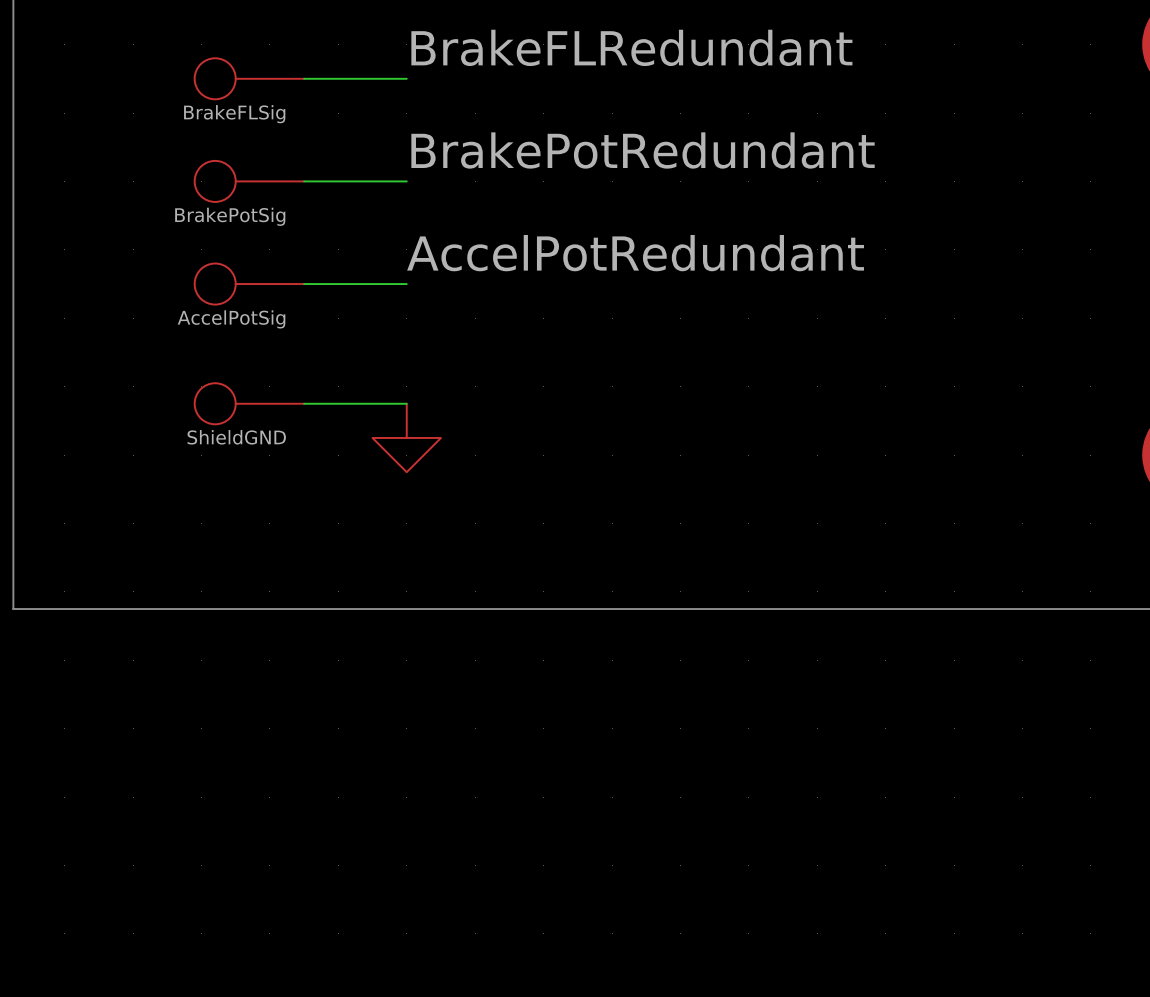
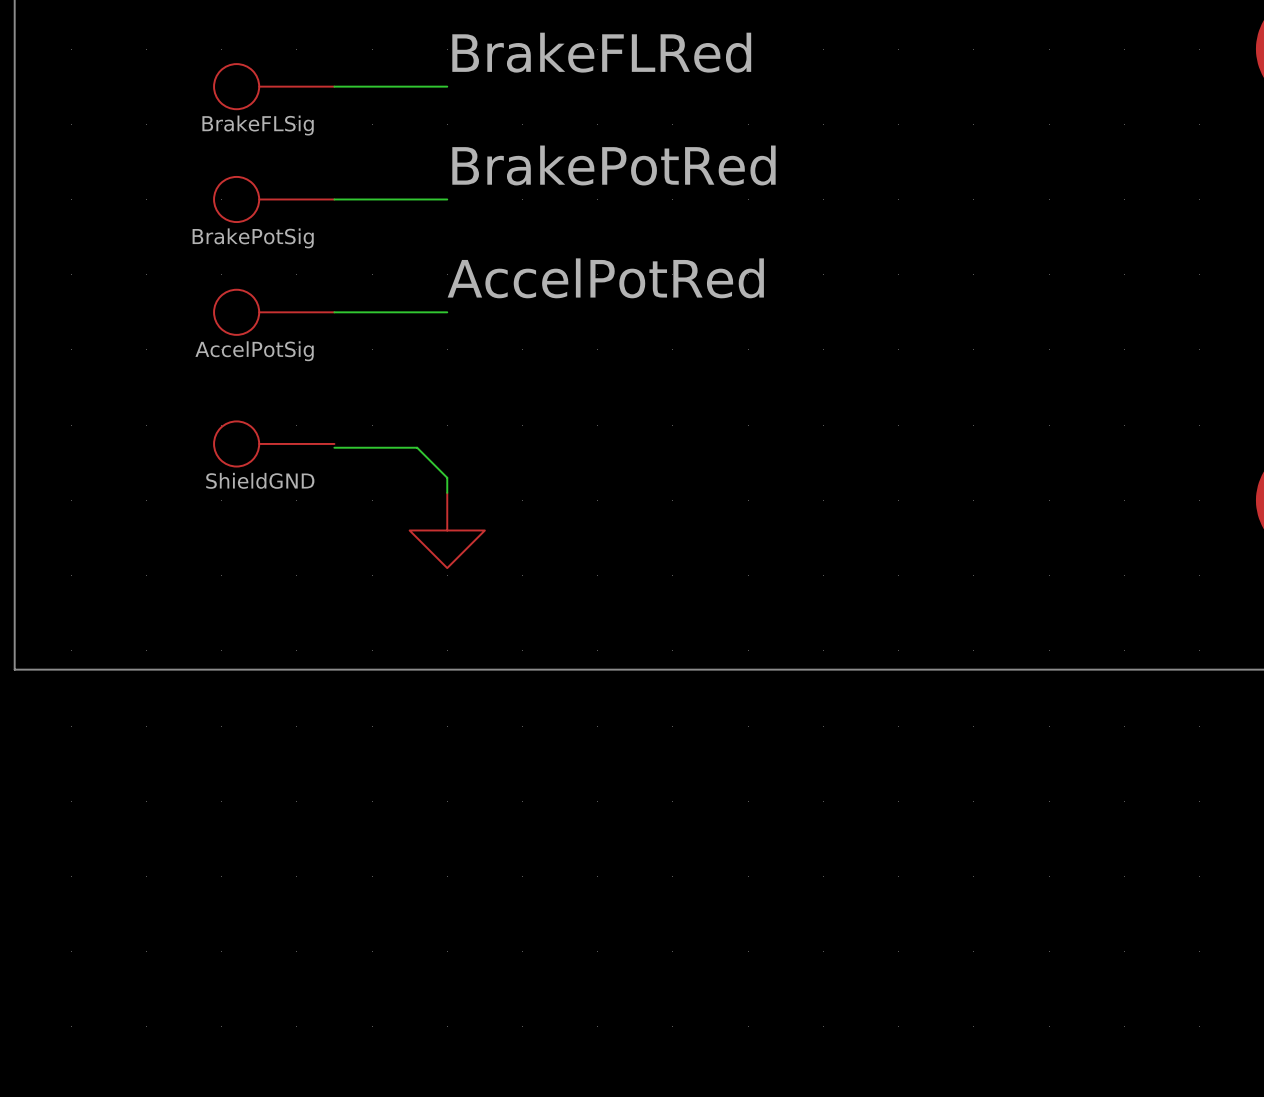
label: BrakeFLRedundant (631, 47) -> BrakeFLRed (601, 52)
label: BrakePotRedundant (643, 150) -> BrakePotRed (613, 165)
label: AccelPotRedundant (635, 253) -> AccelPotRed (605, 278)
wire: (304, 403) (406, 403) -> none
wire: none -> (334, 447) (417, 447) (447, 477) (447, 492)
power symbol position: (406, 437) -> (447, 530)

